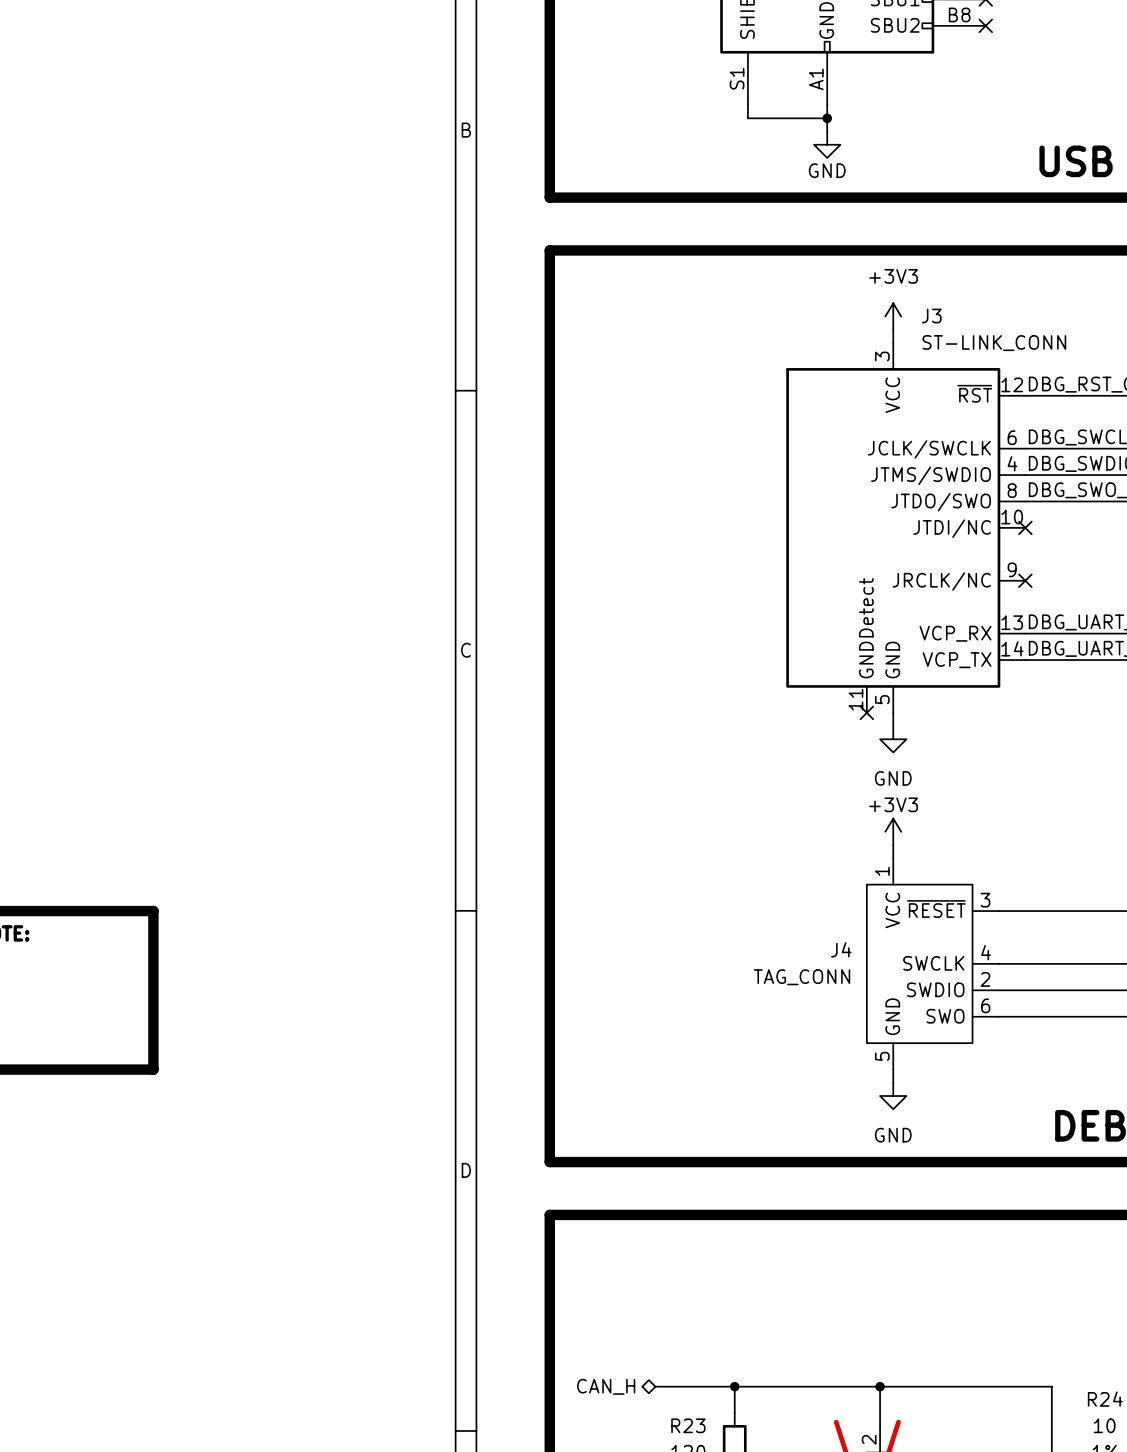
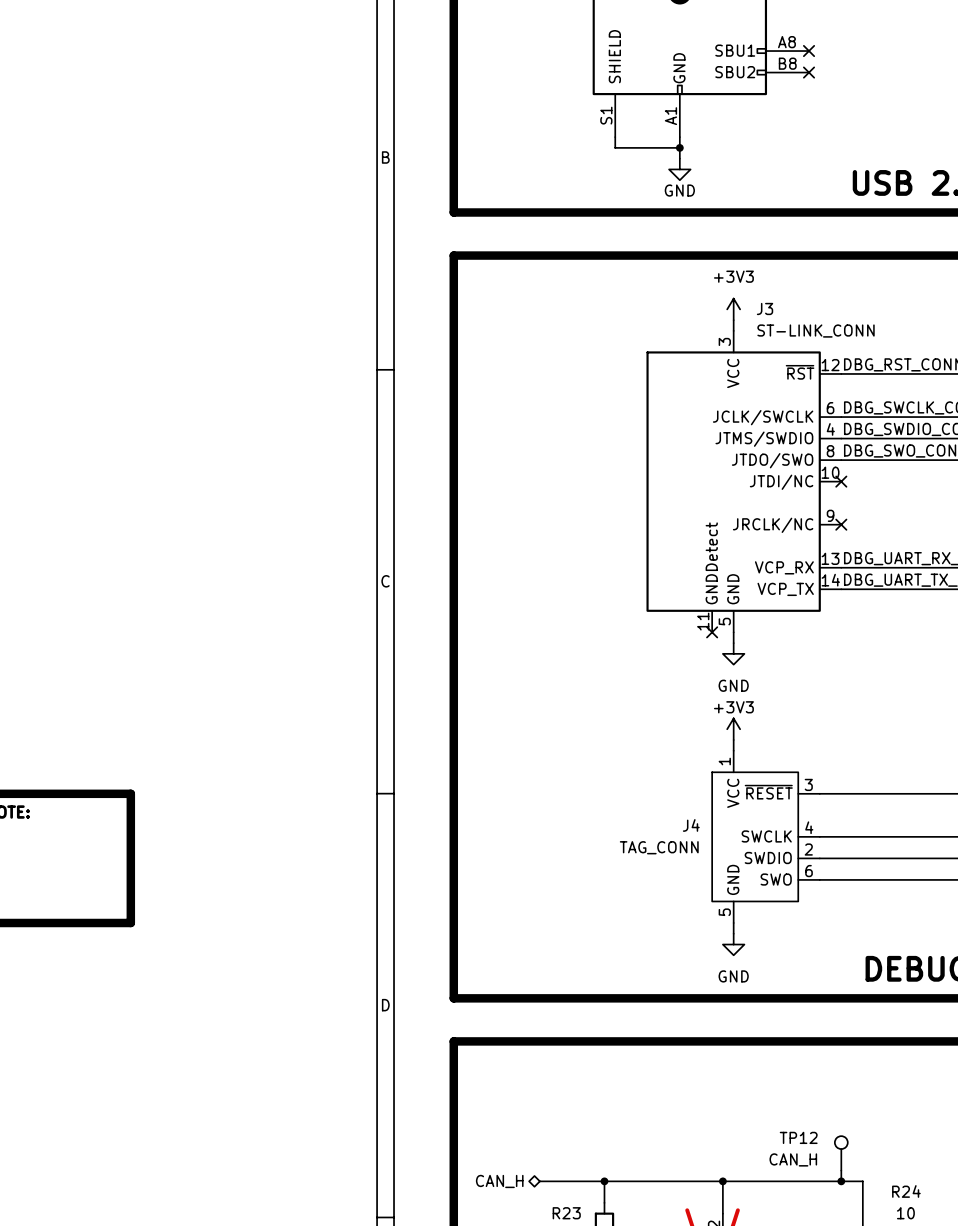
TP12: none -> CAN_H (841, 1153)
wire: none -> (841, 1170) (841, 1181)
junction: none -> (841, 1181)

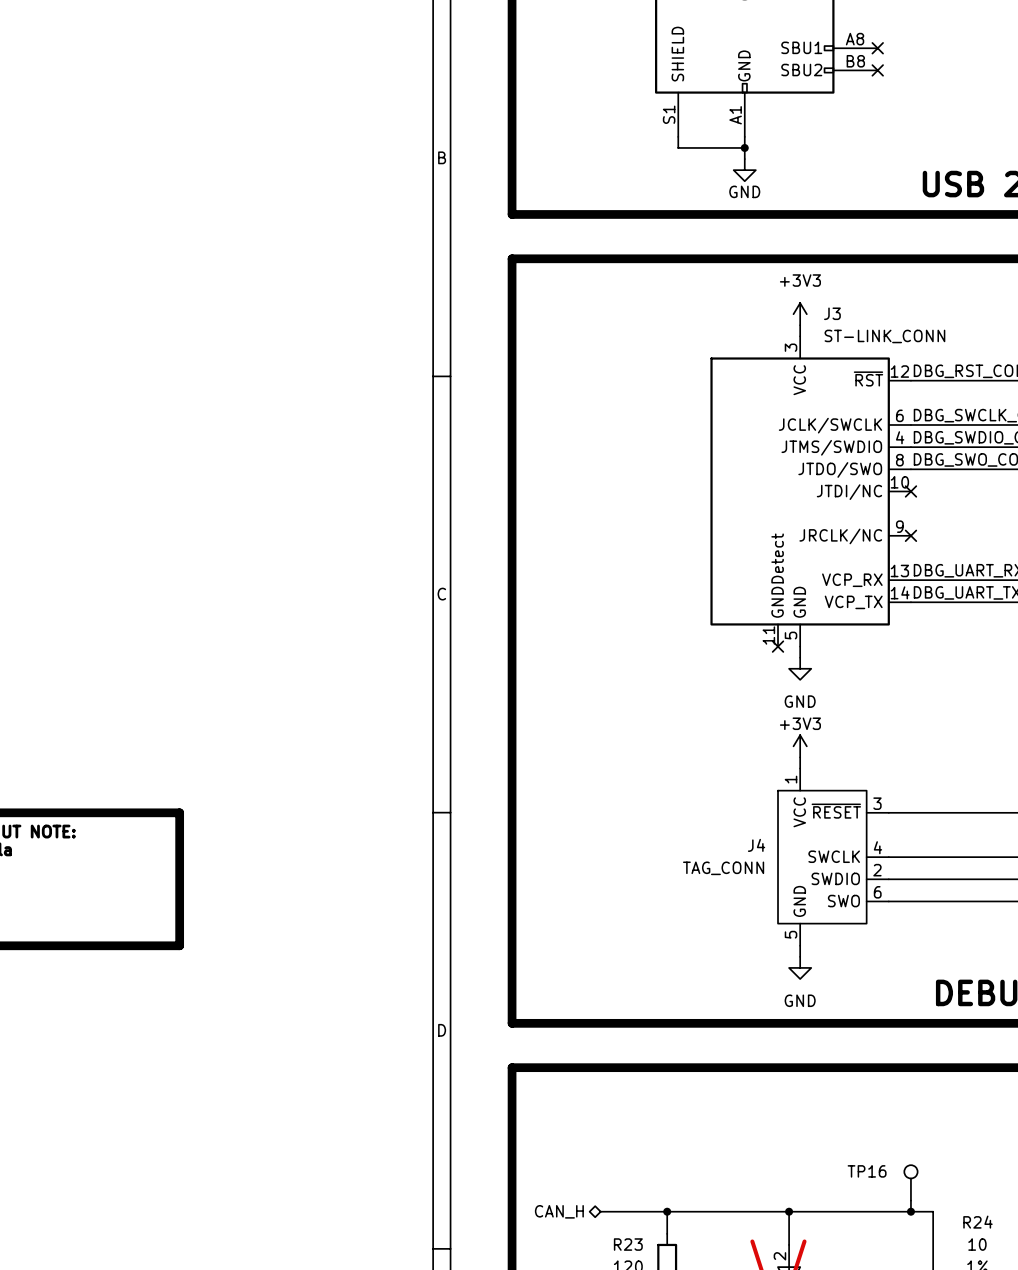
TP12 name: TP12 (798, 1137) -> TP16 (867, 1171)
TP12 value: CAN_H (793, 1159) -> none

